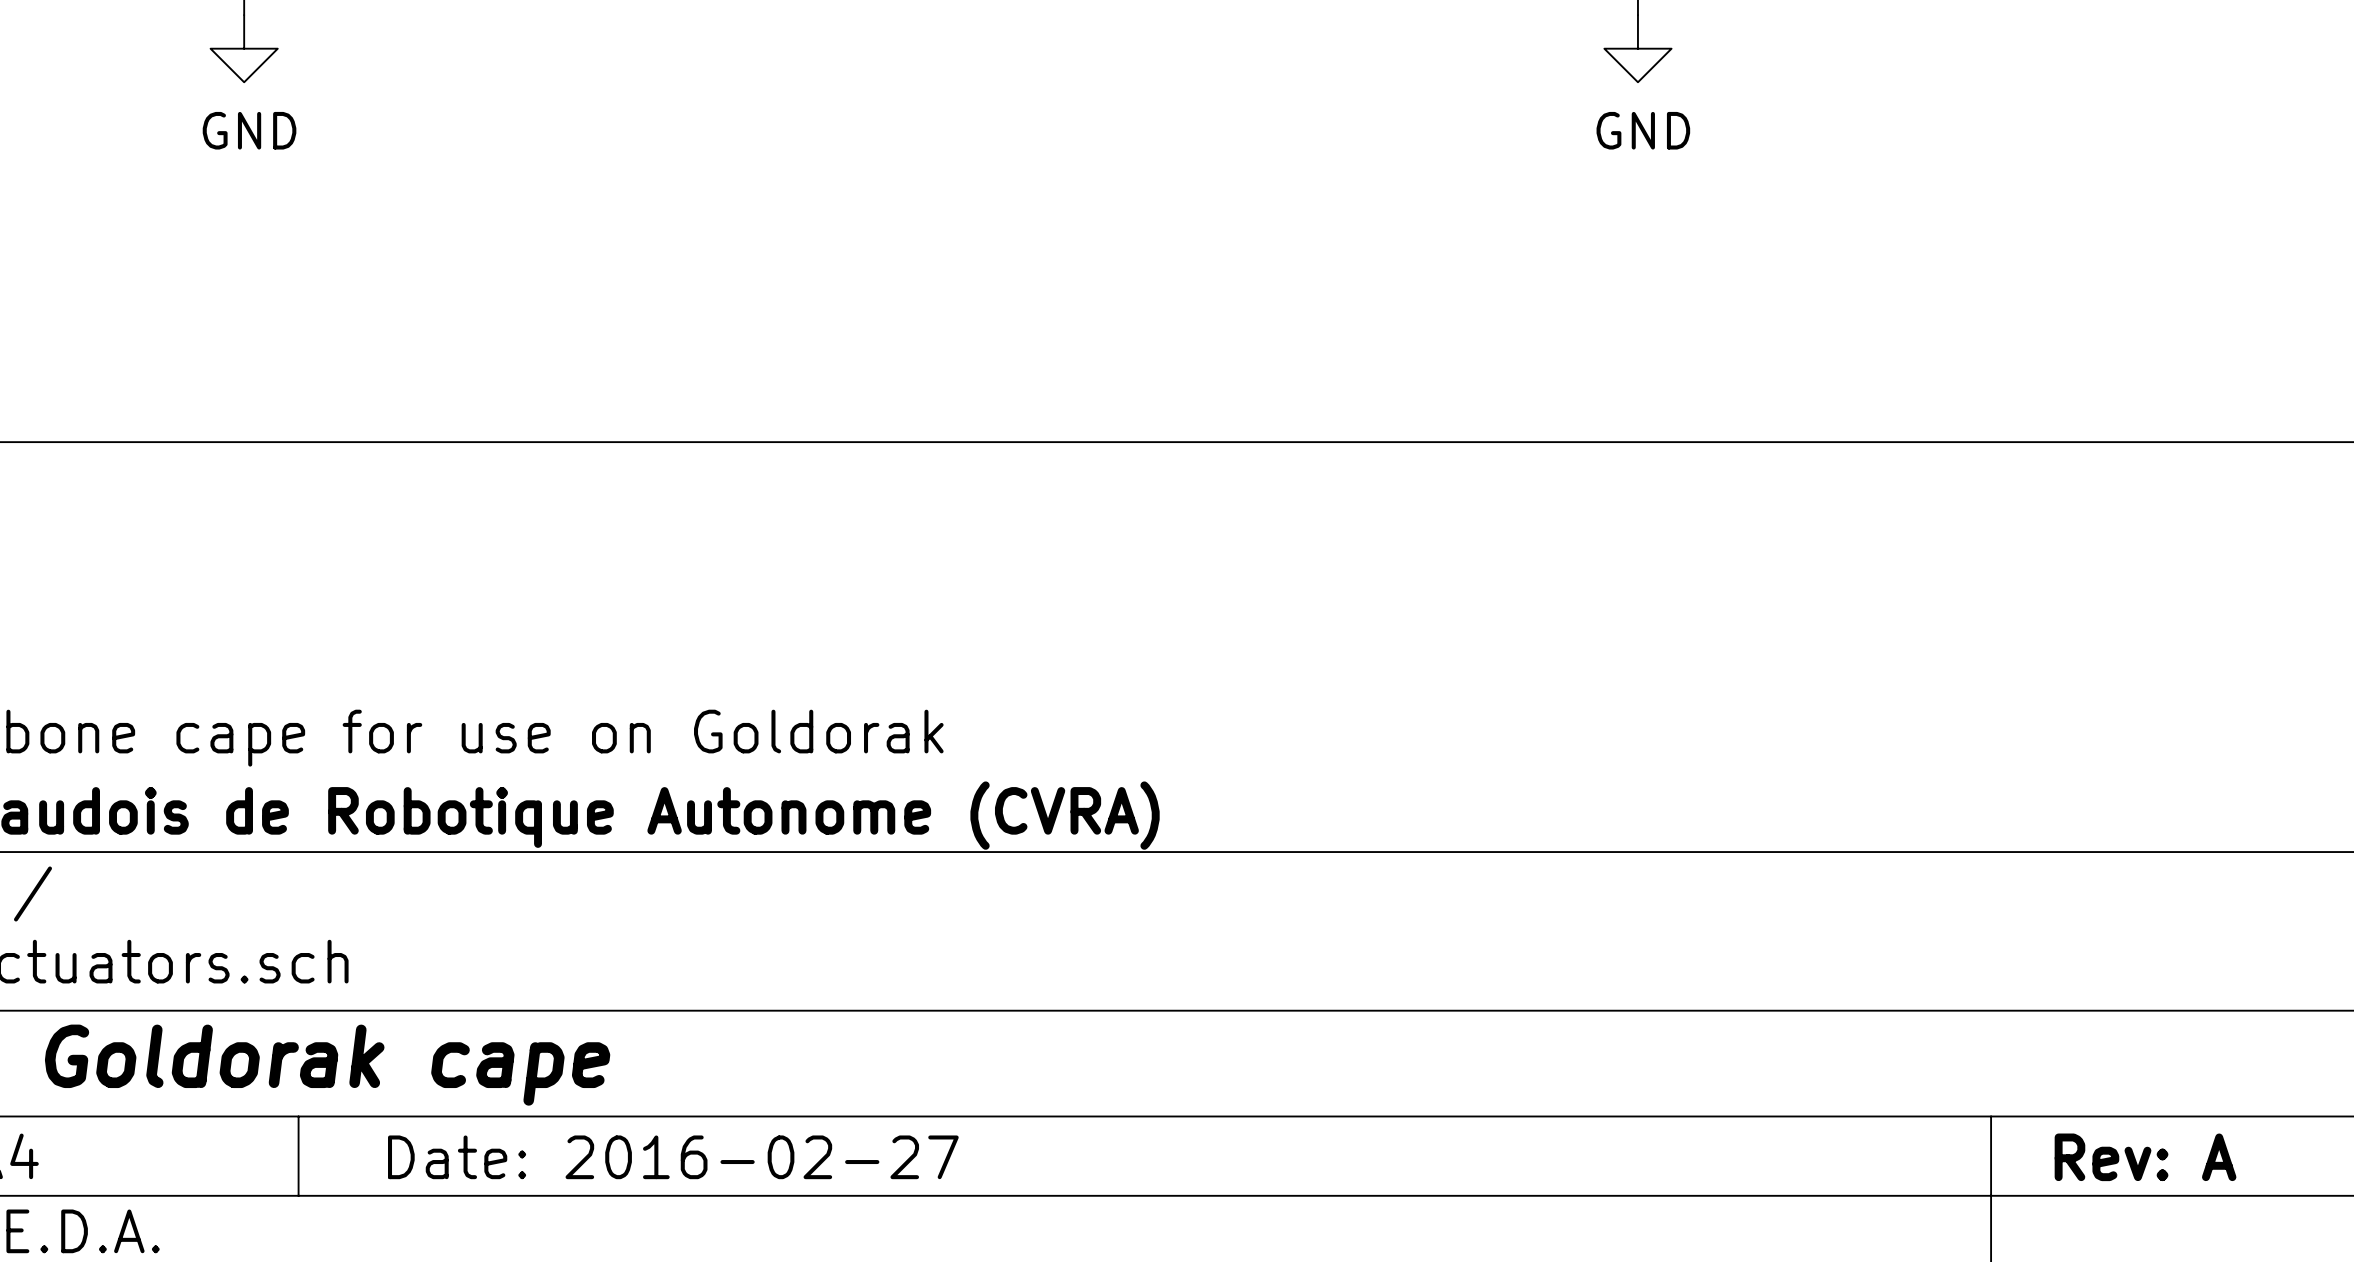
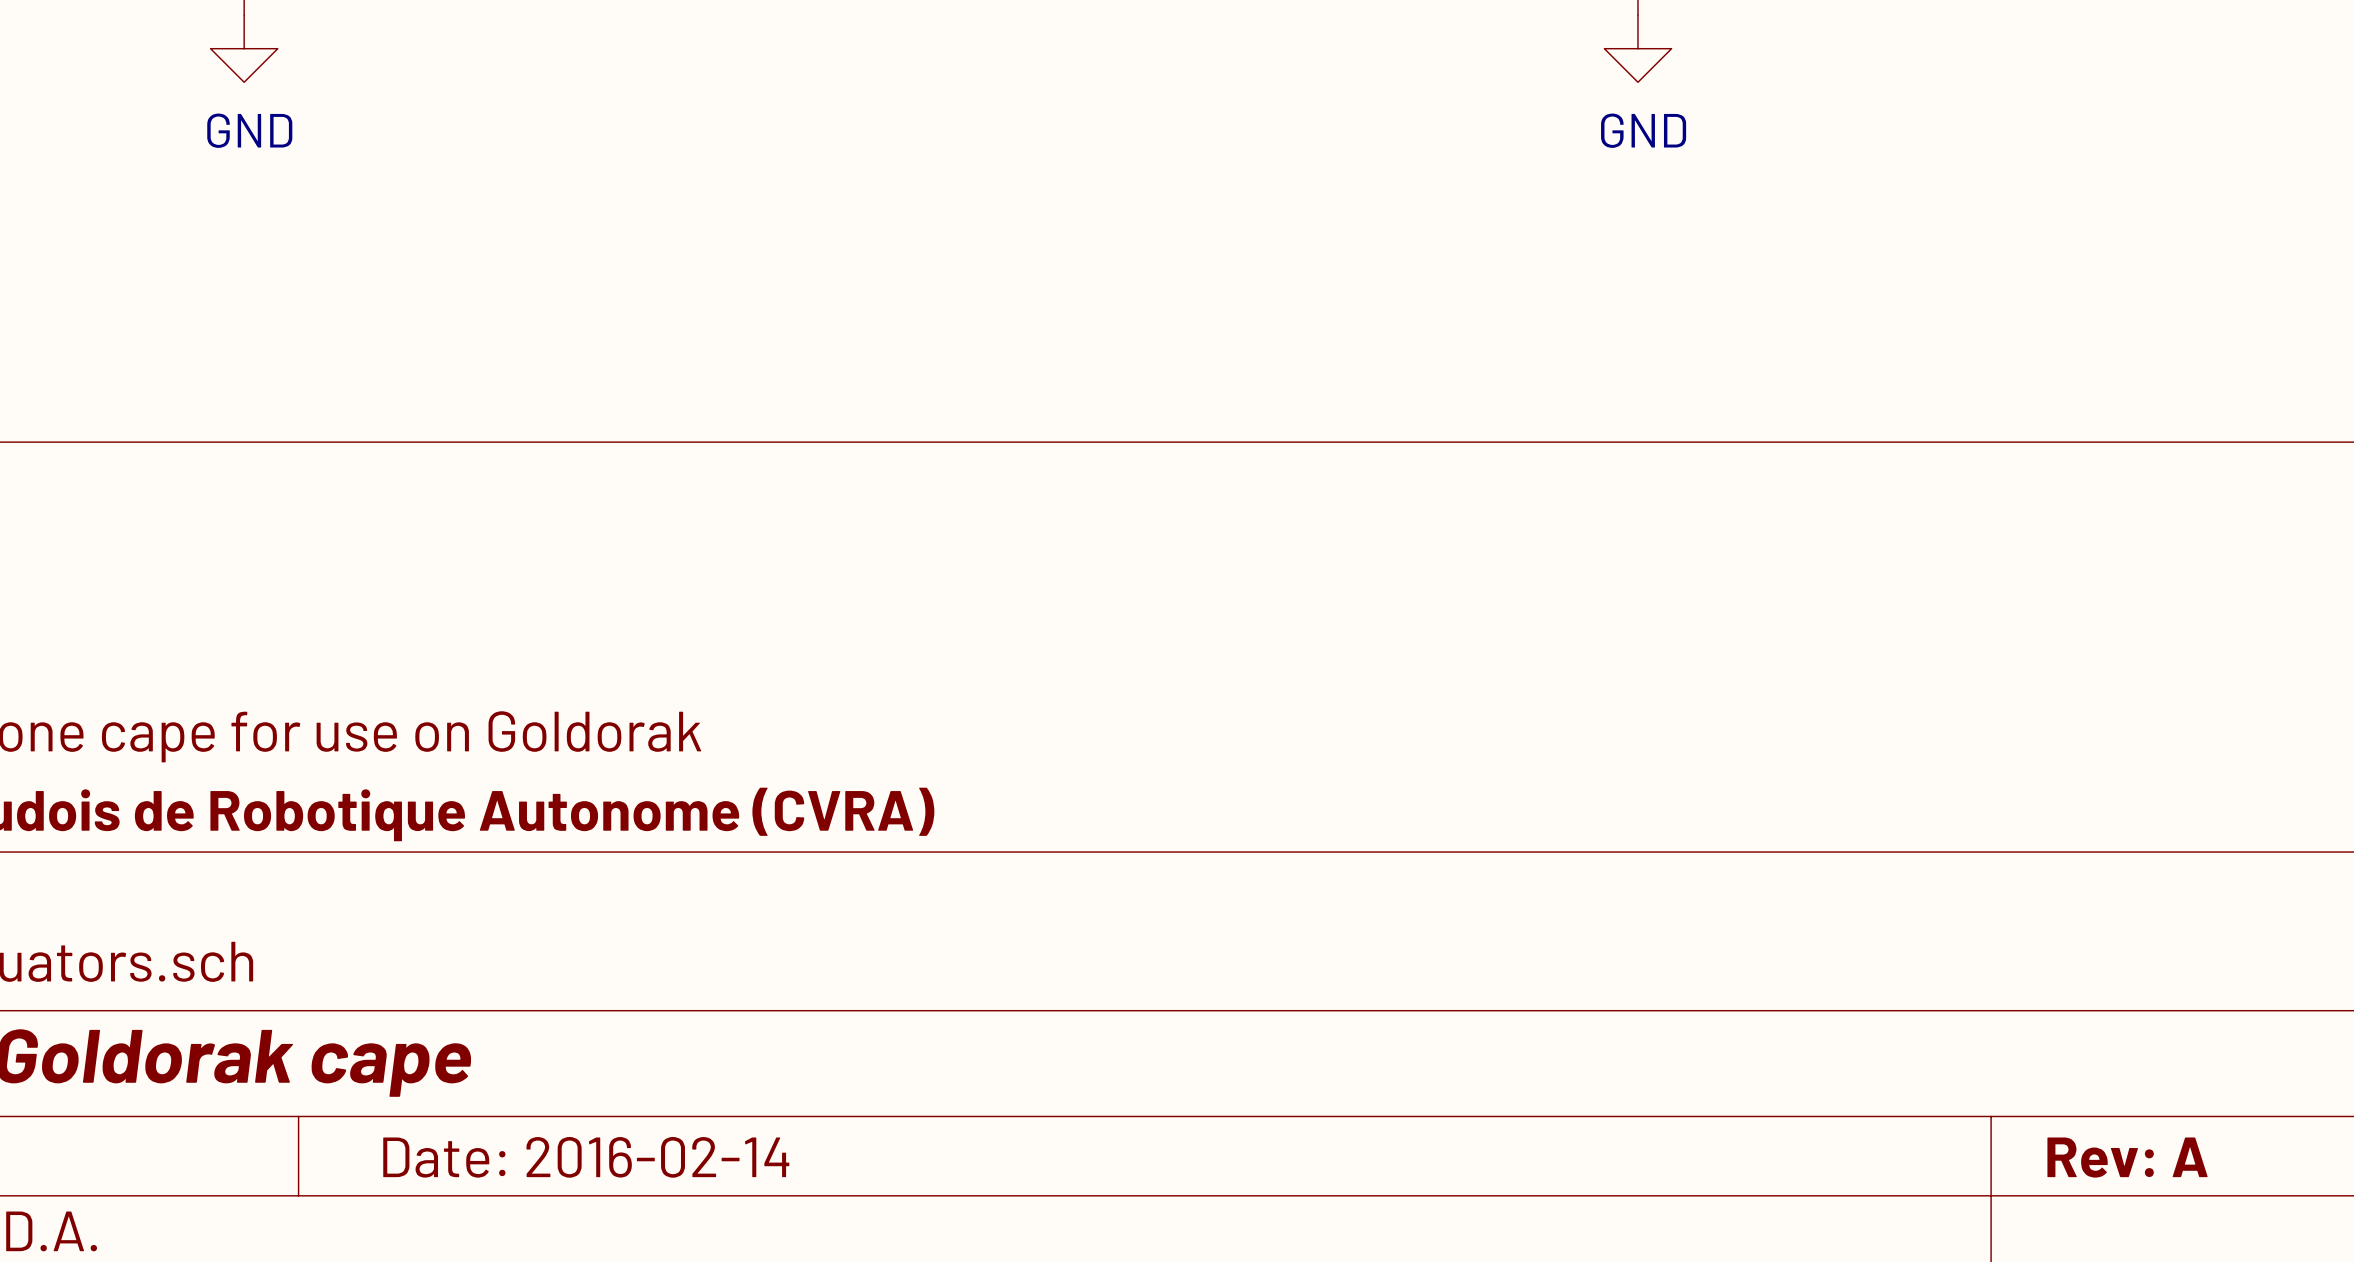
title block: Date: 2016-02-27 (673, 1157) -> Date: 2016-02-14 (586, 1157)

